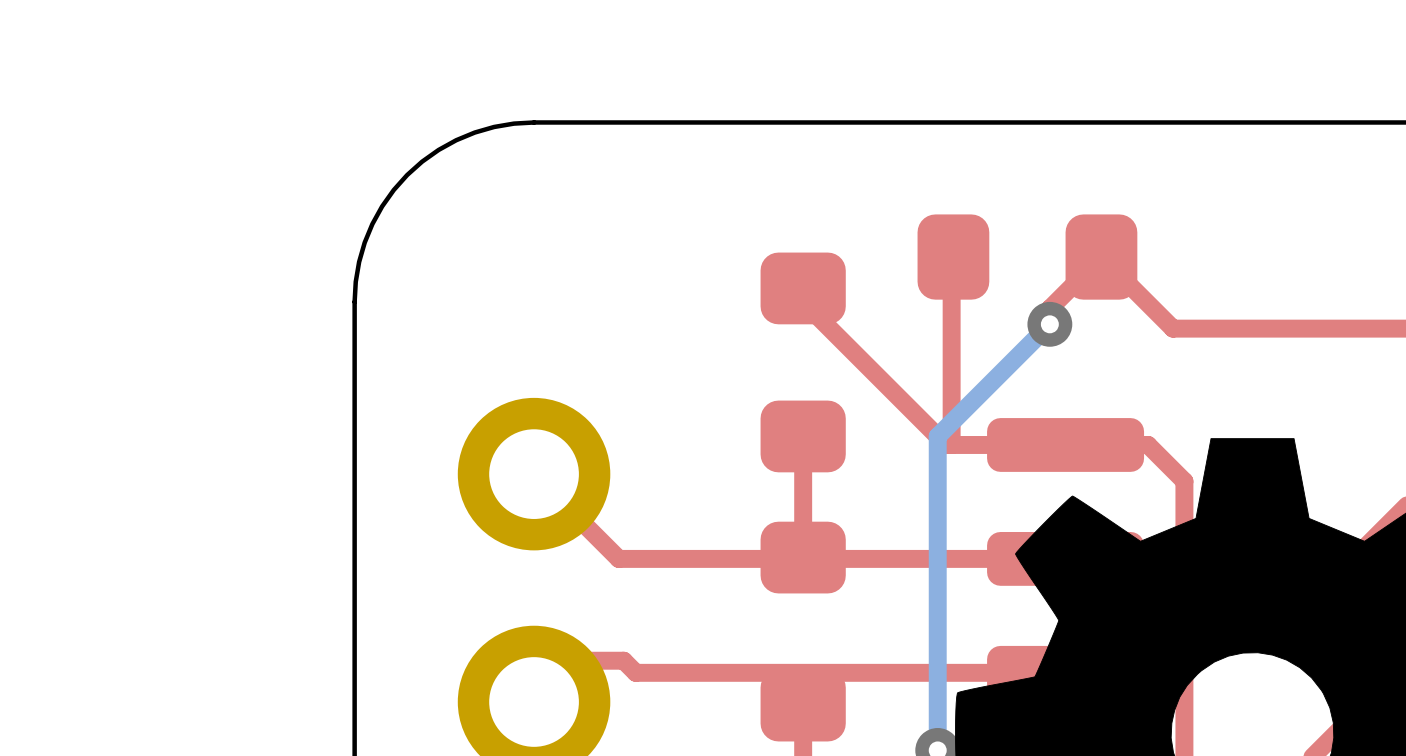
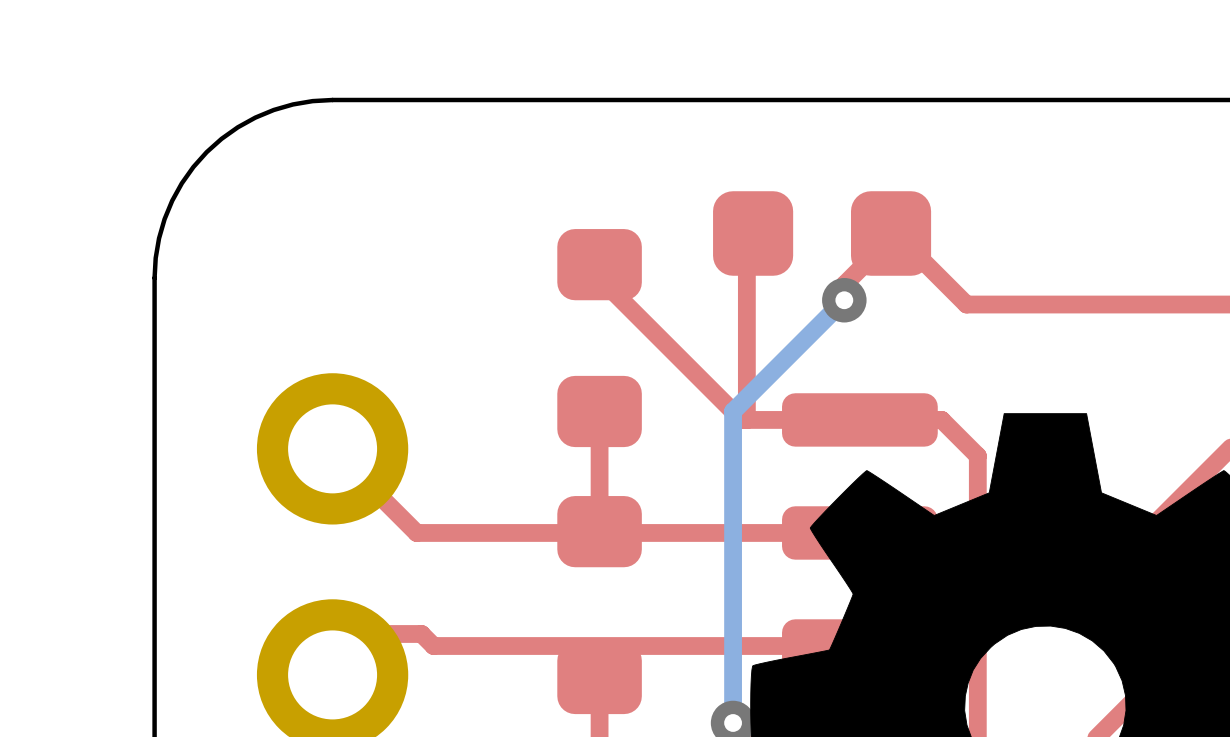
part footprint: [917, 214, 1138, 300] -> [713, 191, 932, 276]

